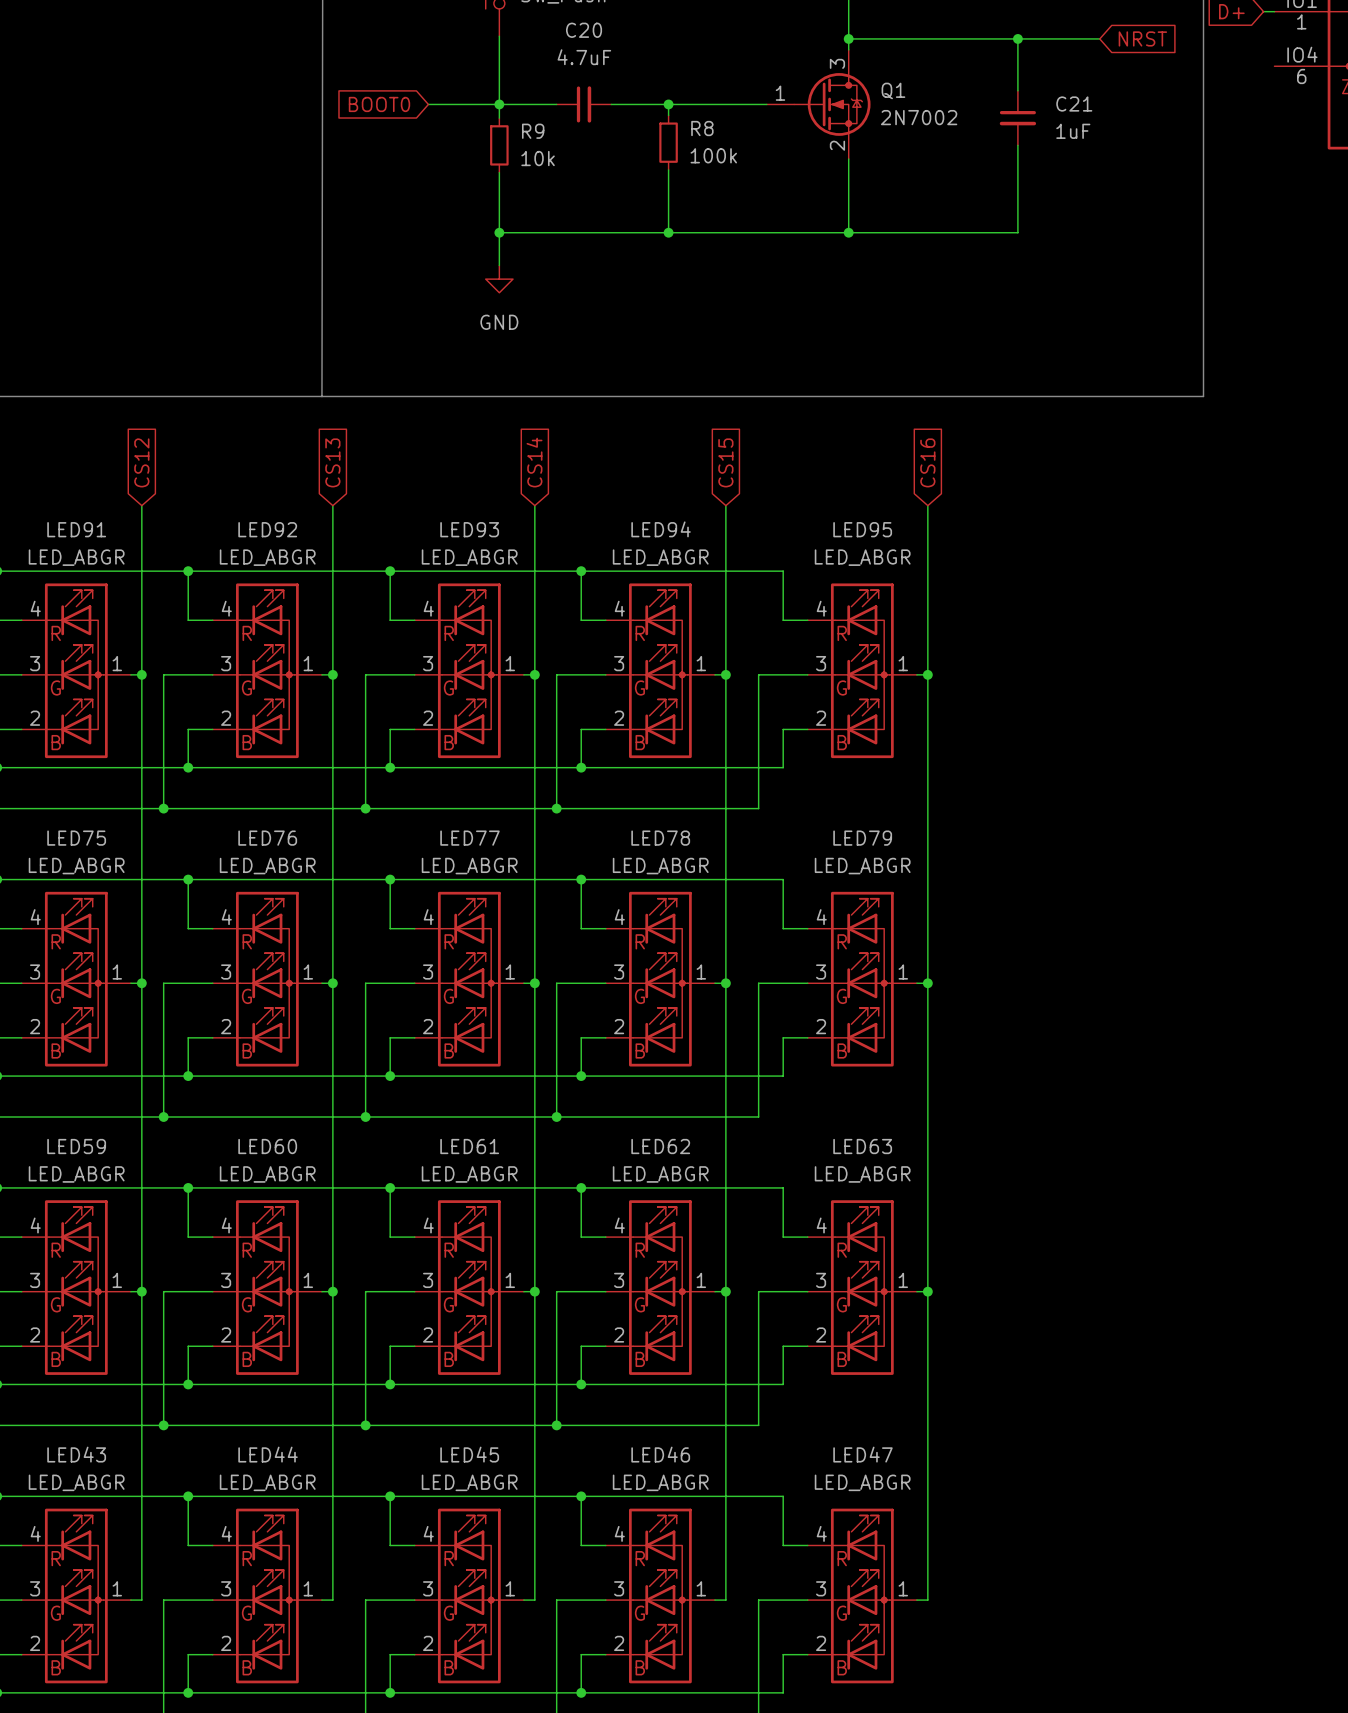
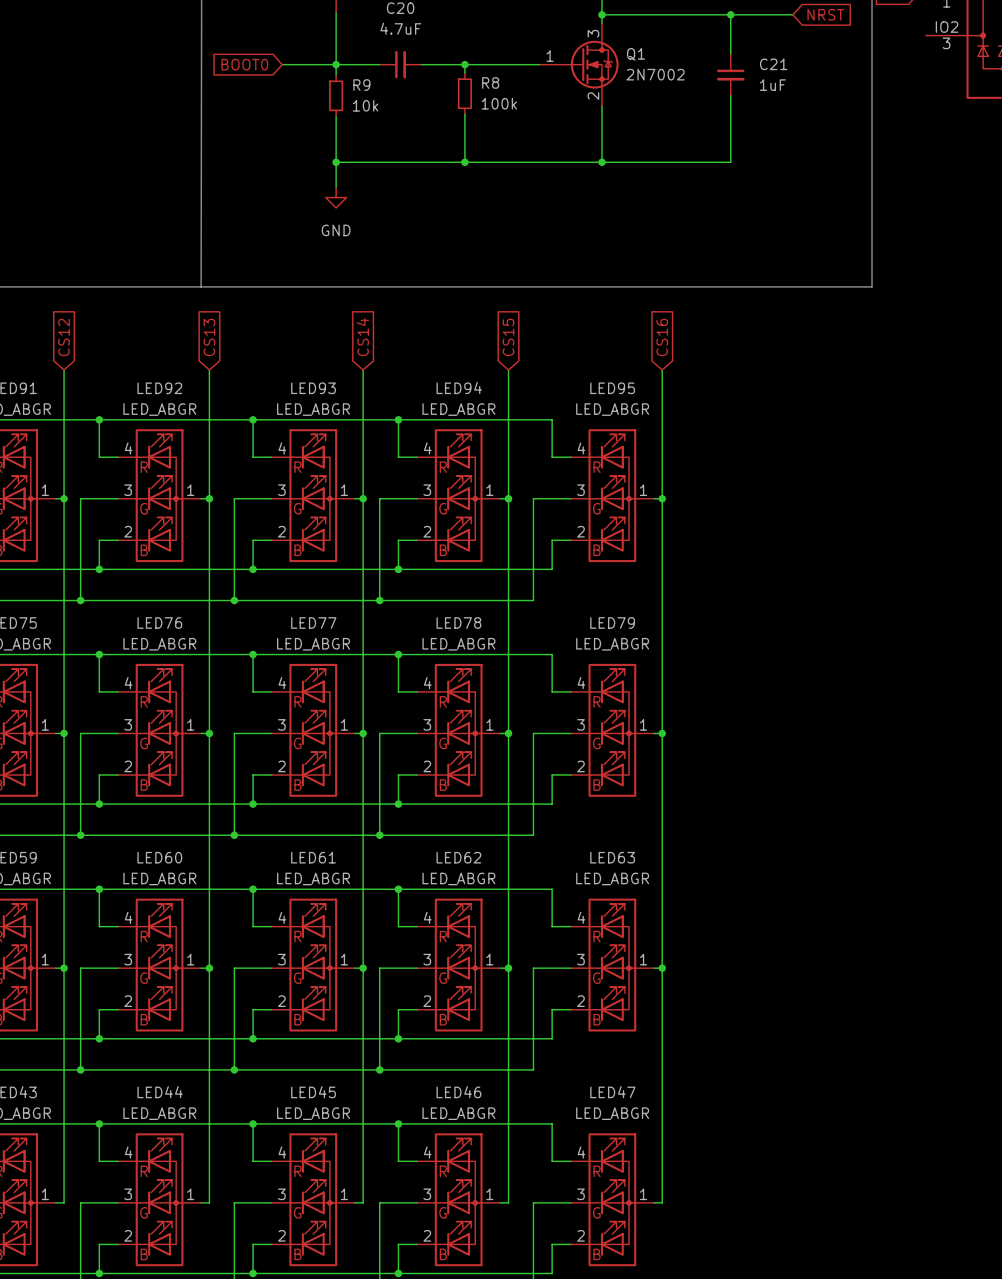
part pin name: IO4 (1302, 54) -> IO2 (947, 27)
part pin number: 6 (1301, 76) -> 3 (946, 43)

